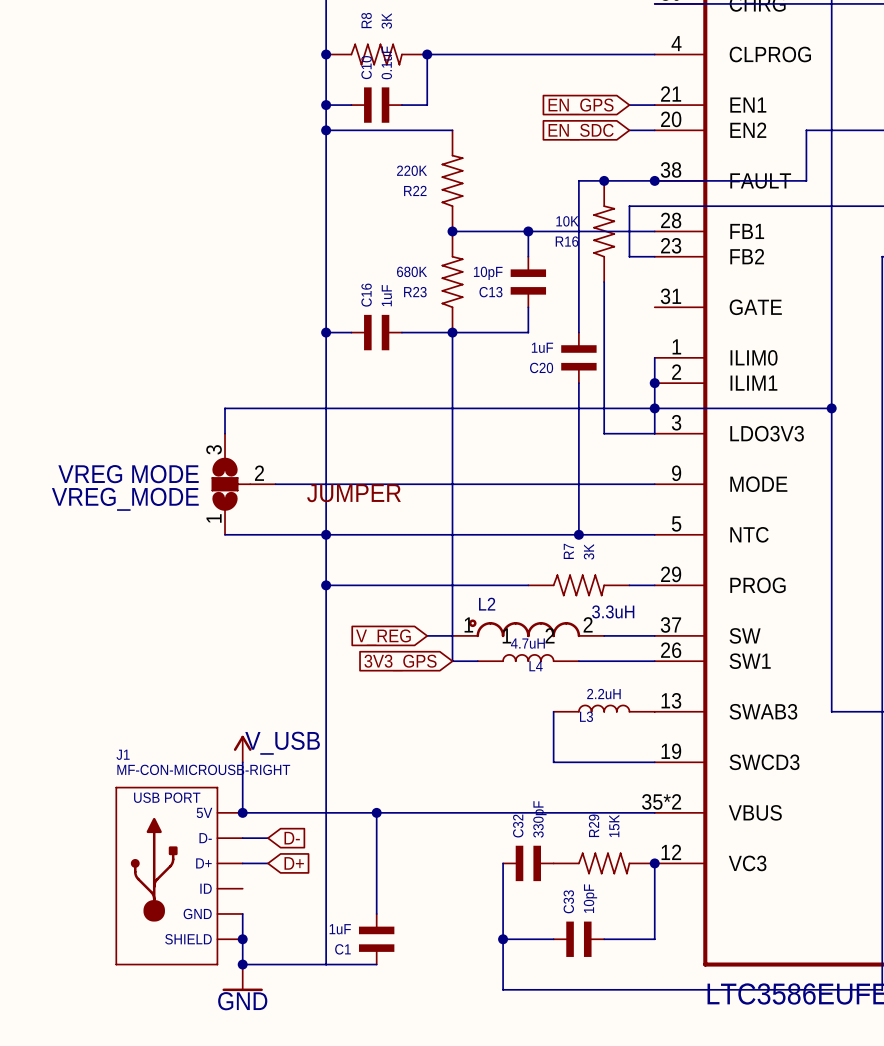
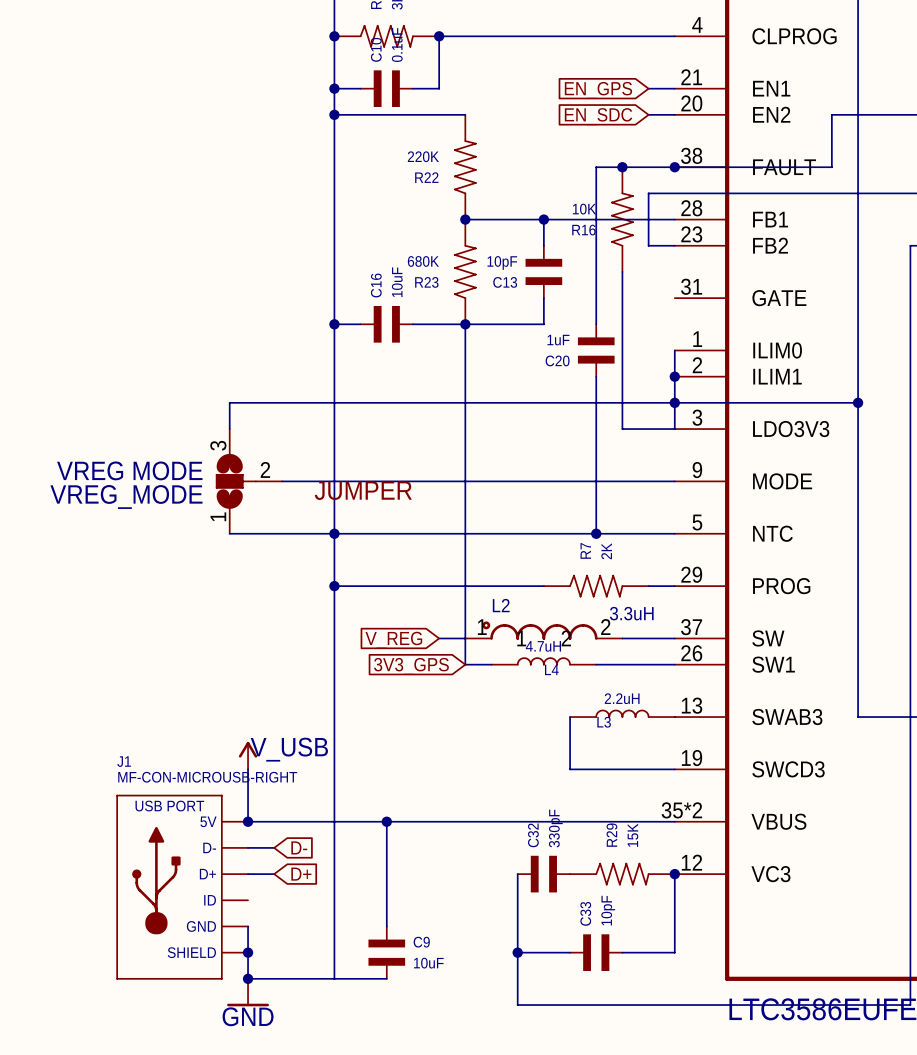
C16 value: 1uF (386, 295) -> 10uF (397, 282)
R7 value: 3K (589, 551) -> 2K (606, 551)
C1 value: 1uF (340, 929) -> 10uF (428, 963)
C1 name: C1 (342, 949) -> C9 (421, 942)

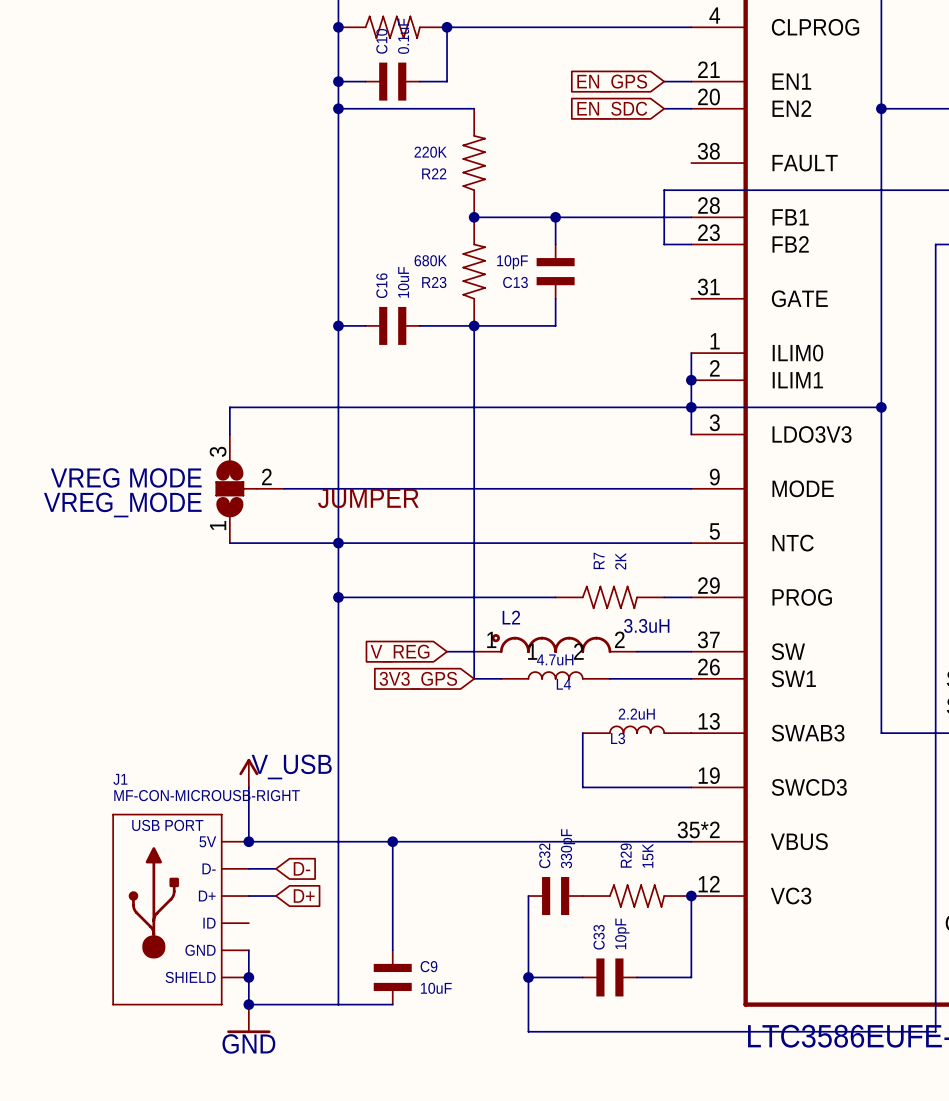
wire: (858, 114) (831, 114) (831, 167) (596, 167) (596, 324) -> none
junction: none -> (881, 108)
junction: (622, 167) -> none
junction: (674, 167) -> none
R16: 10K (622, 219) -> none
wire: (622, 271) (622, 429) (674, 429) -> none
C20: 1uF (596, 350) -> none
wire: (596, 376) (596, 533) -> none
junction: (596, 533) -> none

